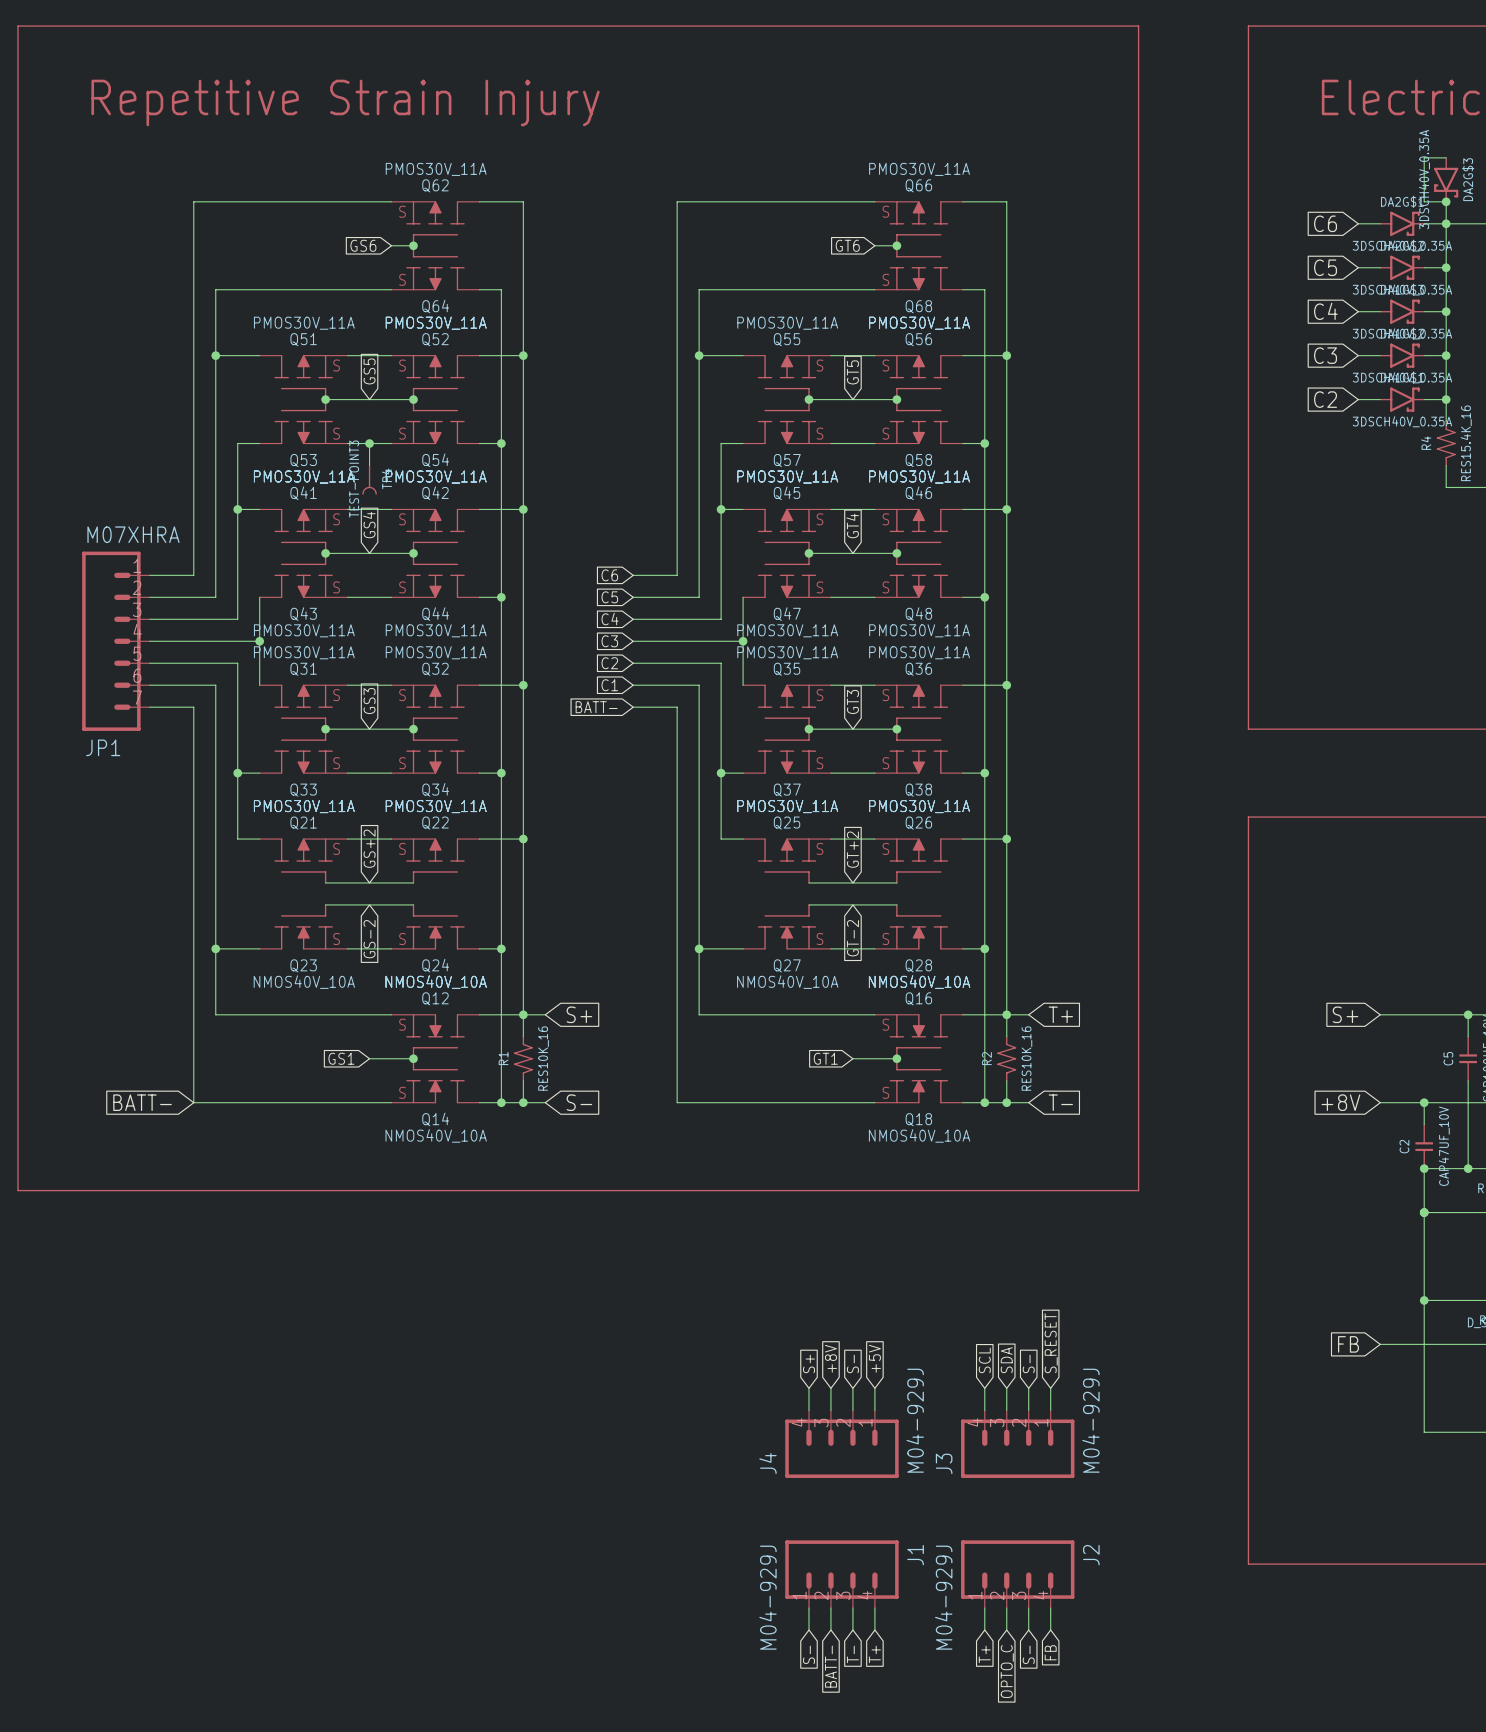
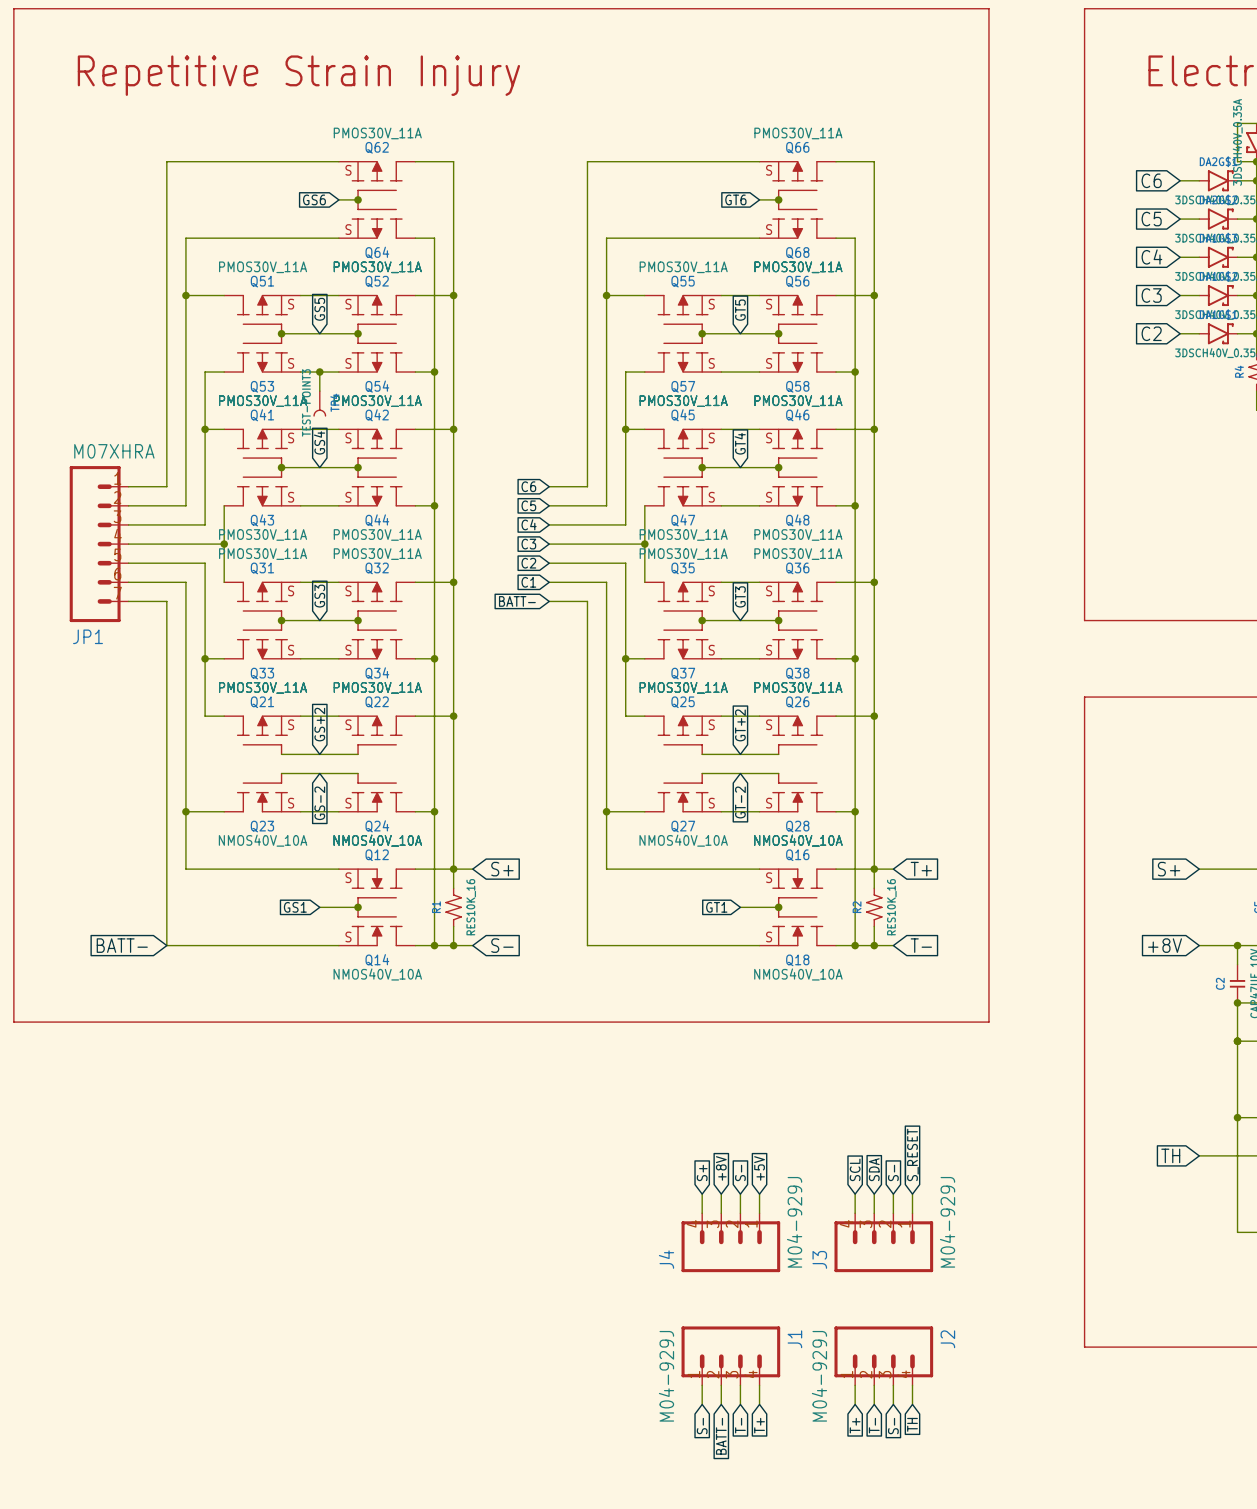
global label: FB (1348, 1344) -> TH (1170, 1155)
global label: FB (1050, 1652) -> TH (912, 1424)
global label: OPTO_C (1007, 1671) -> T- (874, 1425)

